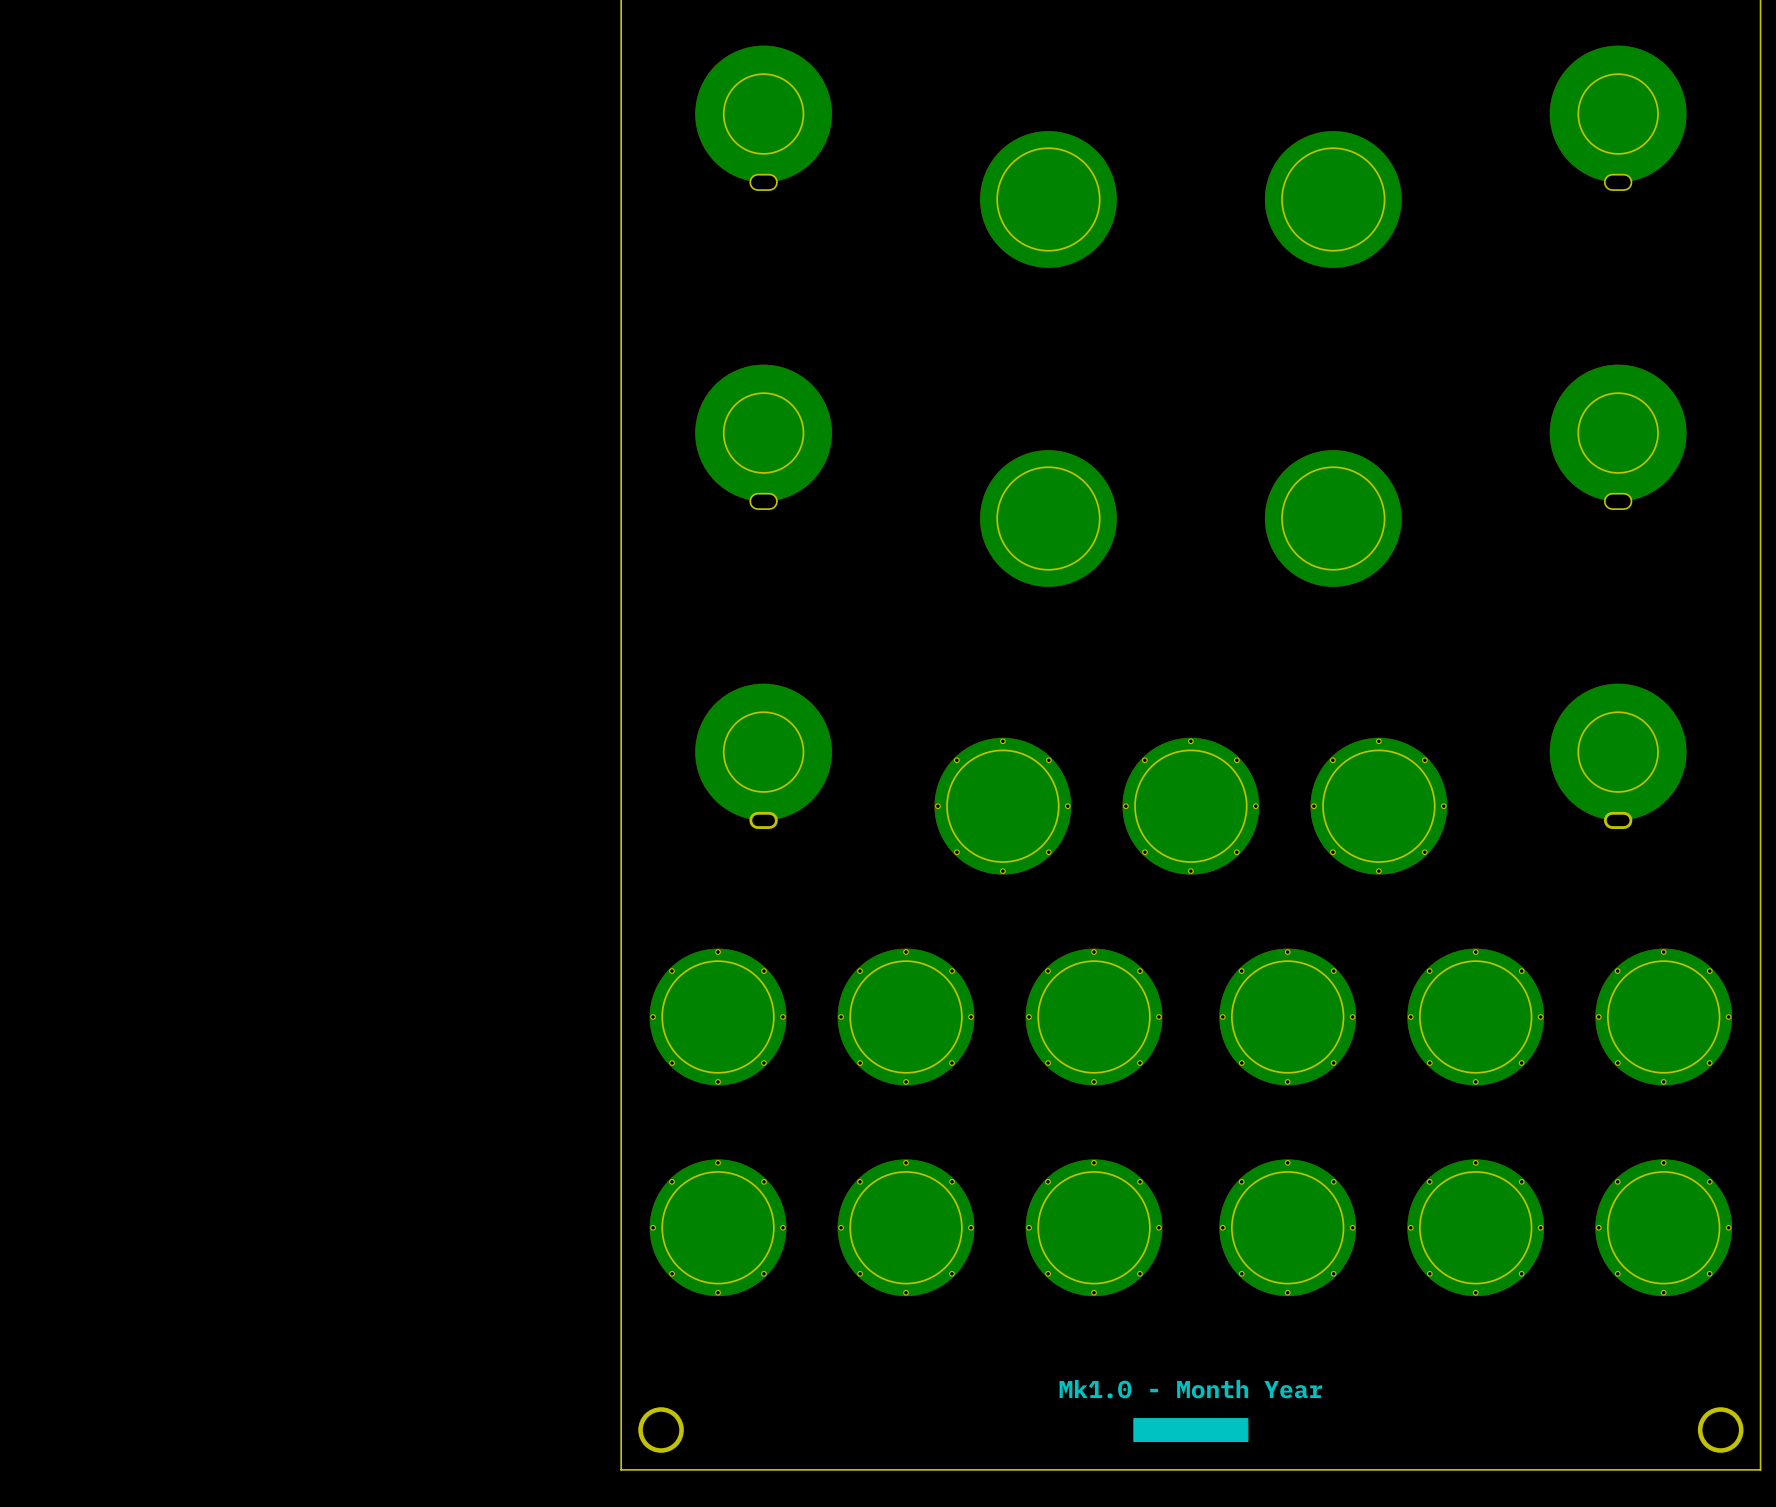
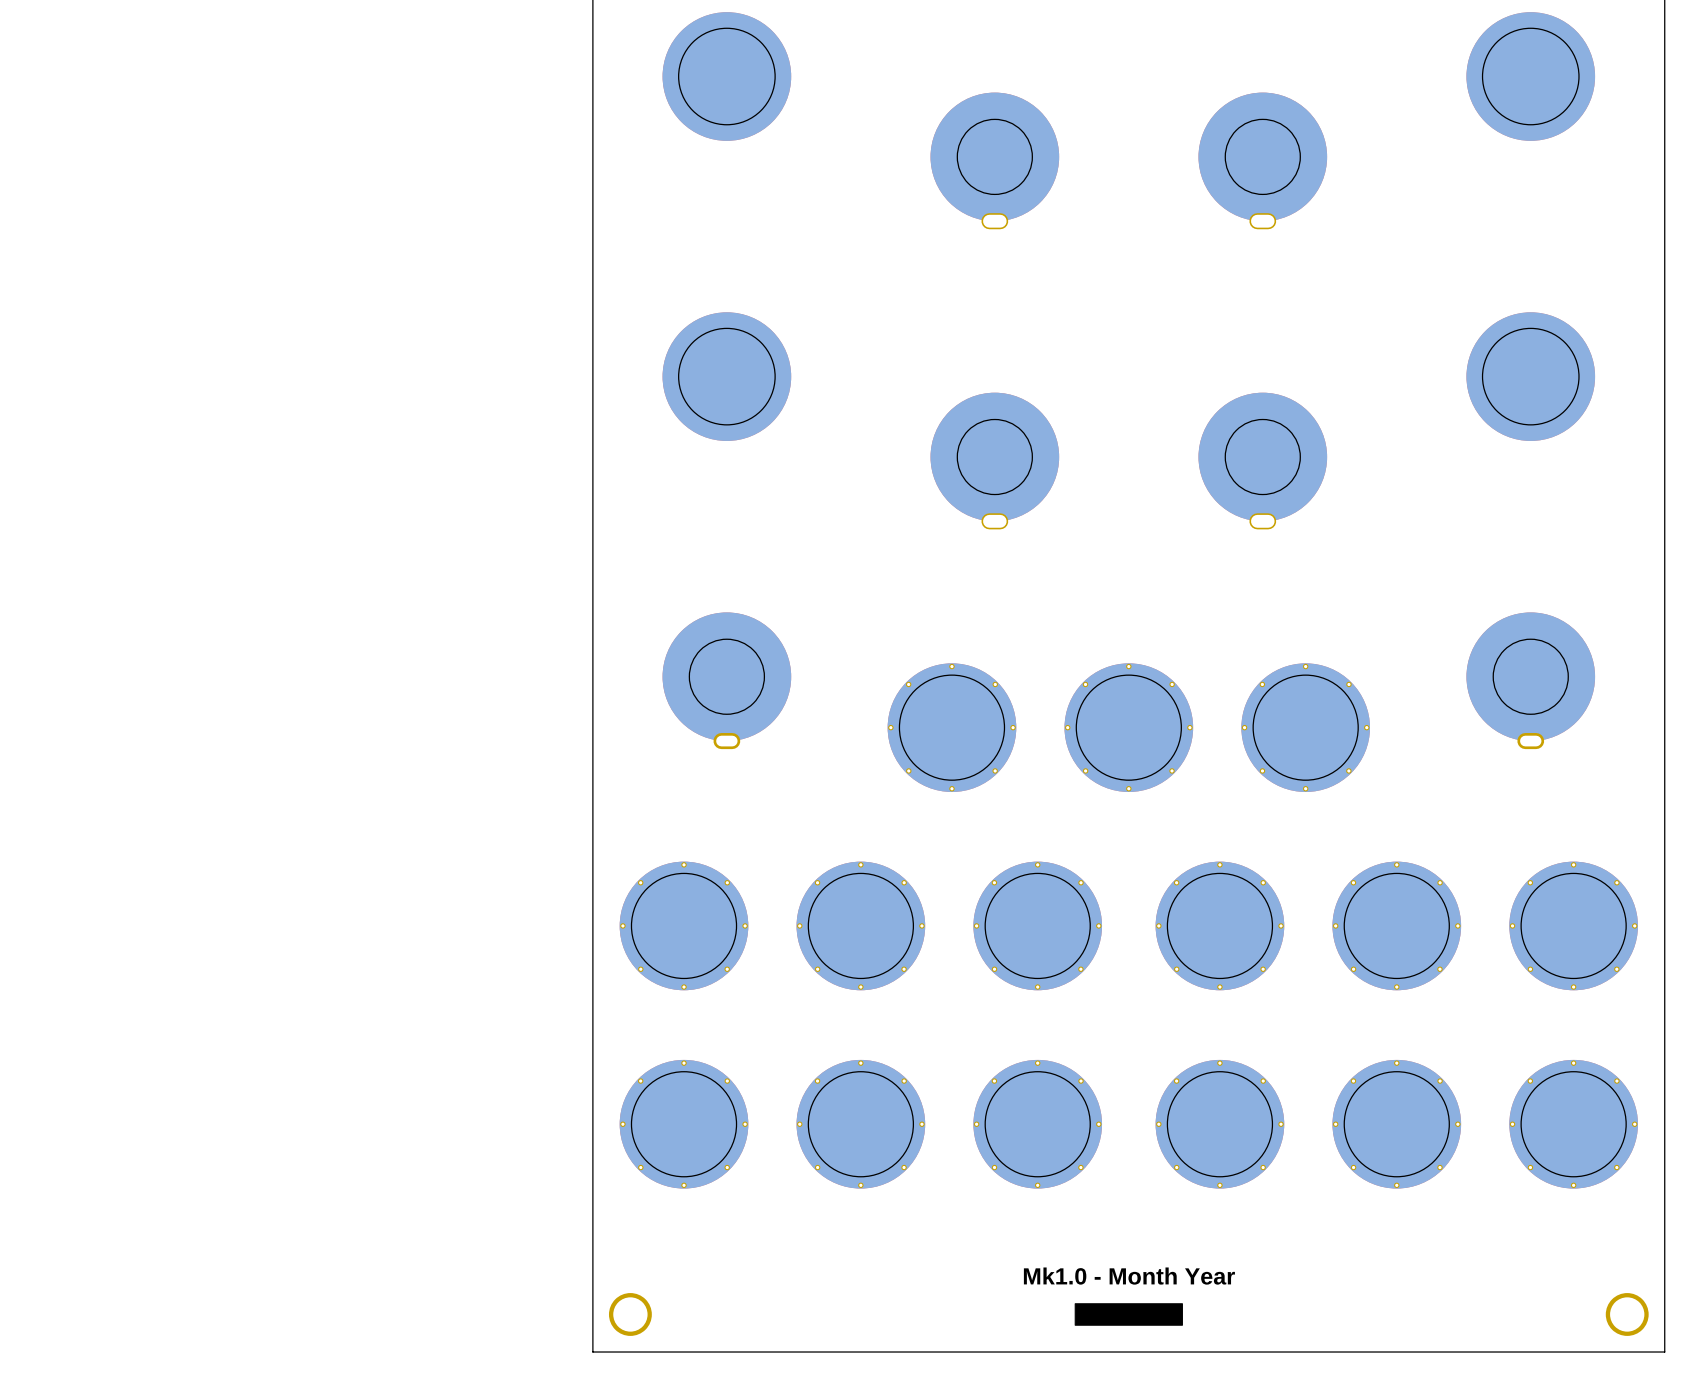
part footprint: [695, 45, 832, 191] -> [662, 12, 792, 141]
part footprint: [1549, 45, 1687, 191] -> [1466, 12, 1596, 141]
part footprint: [980, 131, 1117, 268] -> [930, 92, 1060, 230]
part footprint: [1264, 131, 1402, 268] -> [1198, 92, 1328, 230]
part footprint: [695, 364, 832, 510] -> [662, 312, 792, 441]
part footprint: [1549, 364, 1687, 510] -> [1466, 312, 1596, 441]
part footprint: [980, 450, 1117, 587] -> [930, 392, 1060, 530]
part footprint: [1264, 450, 1402, 587] -> [1198, 392, 1328, 530]

